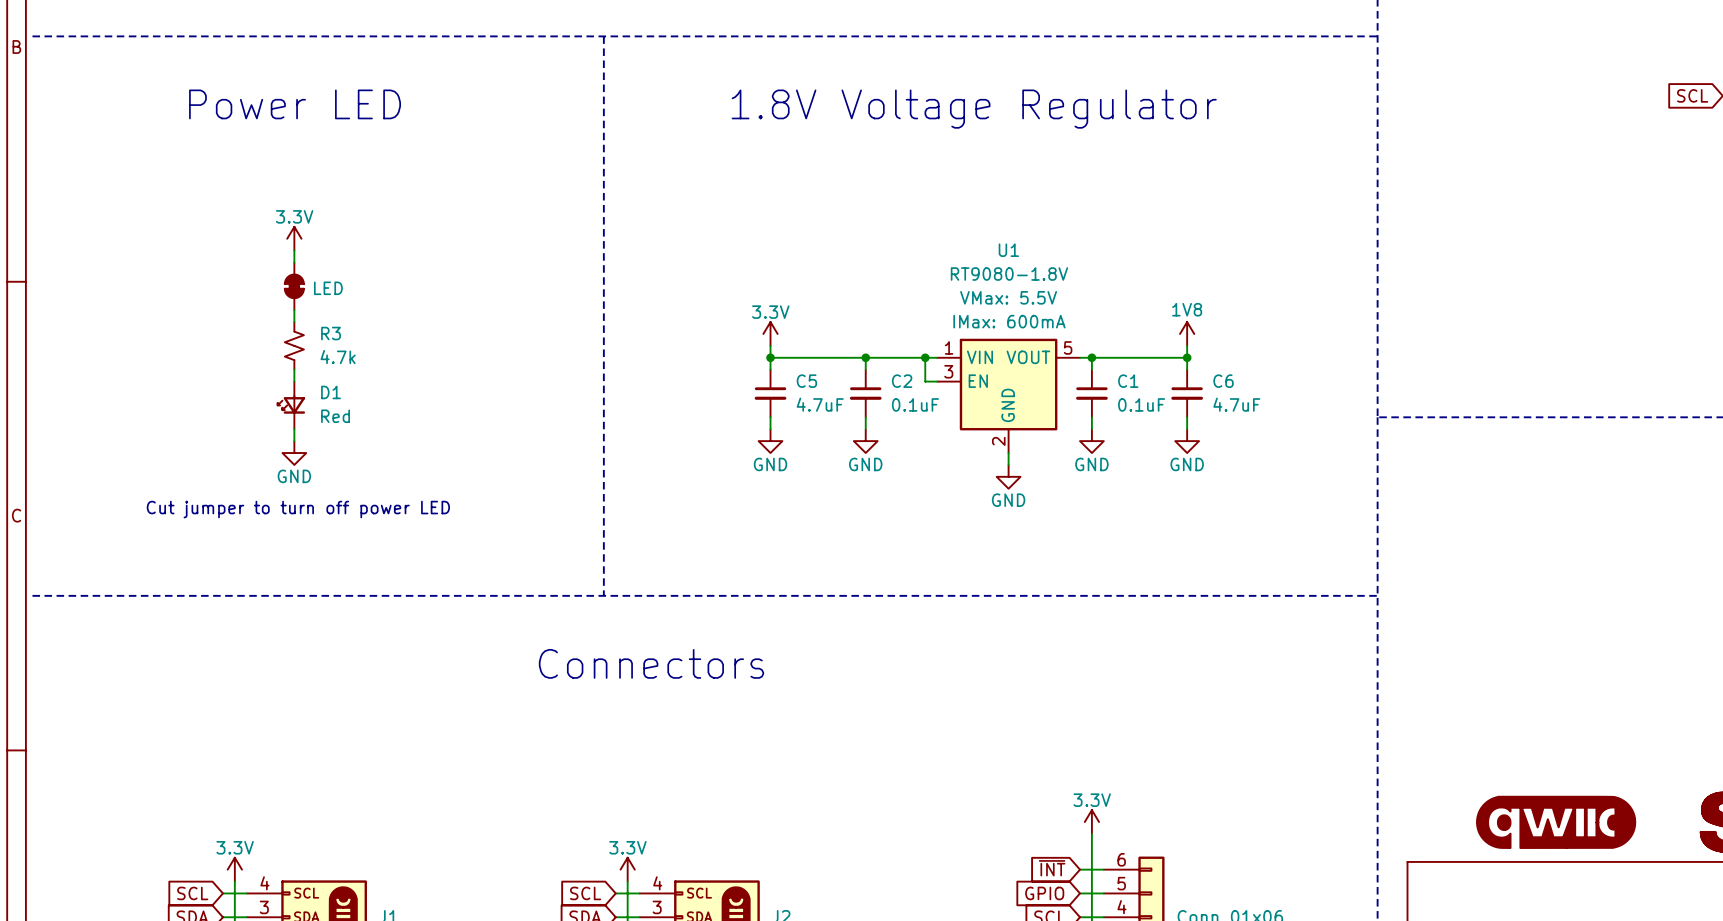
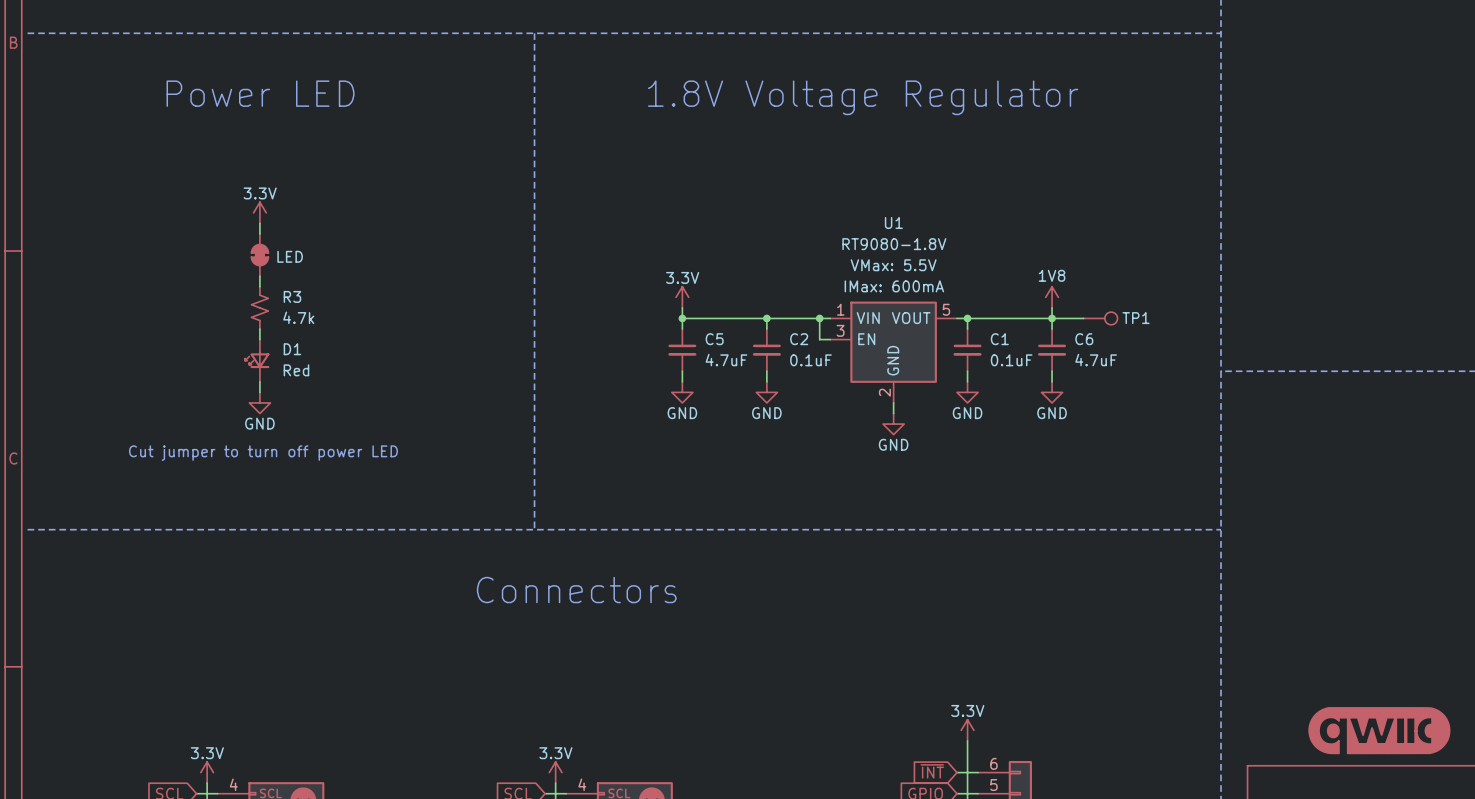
wire: none -> (1052, 318) (1083, 318)
TP1: none -> (1100, 318)

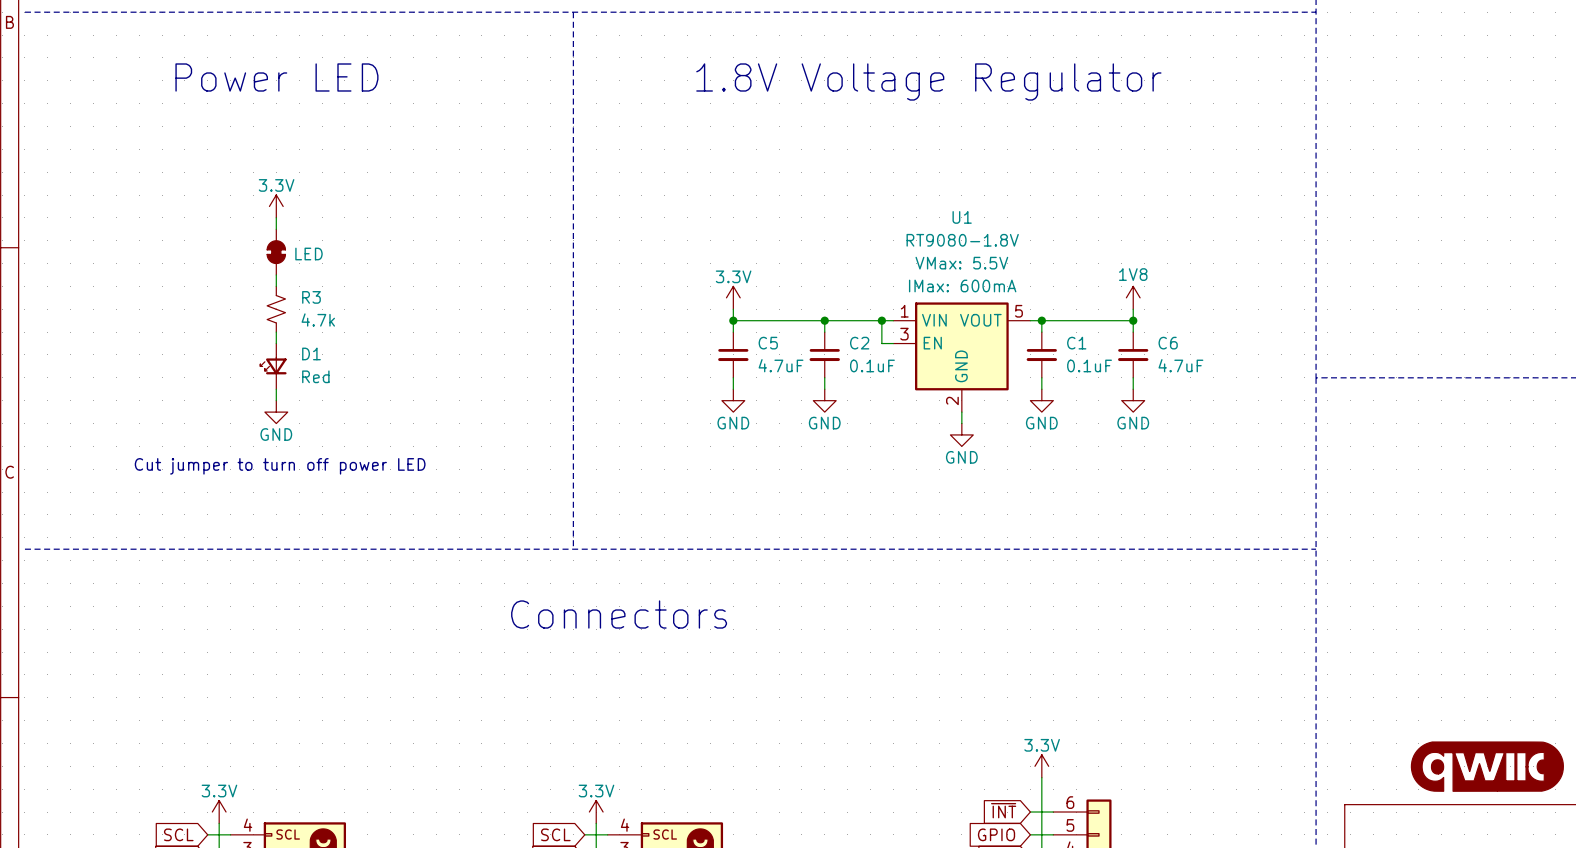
wire: (1052, 318) (1083, 318) -> none
TP1: (1100, 318) -> none

